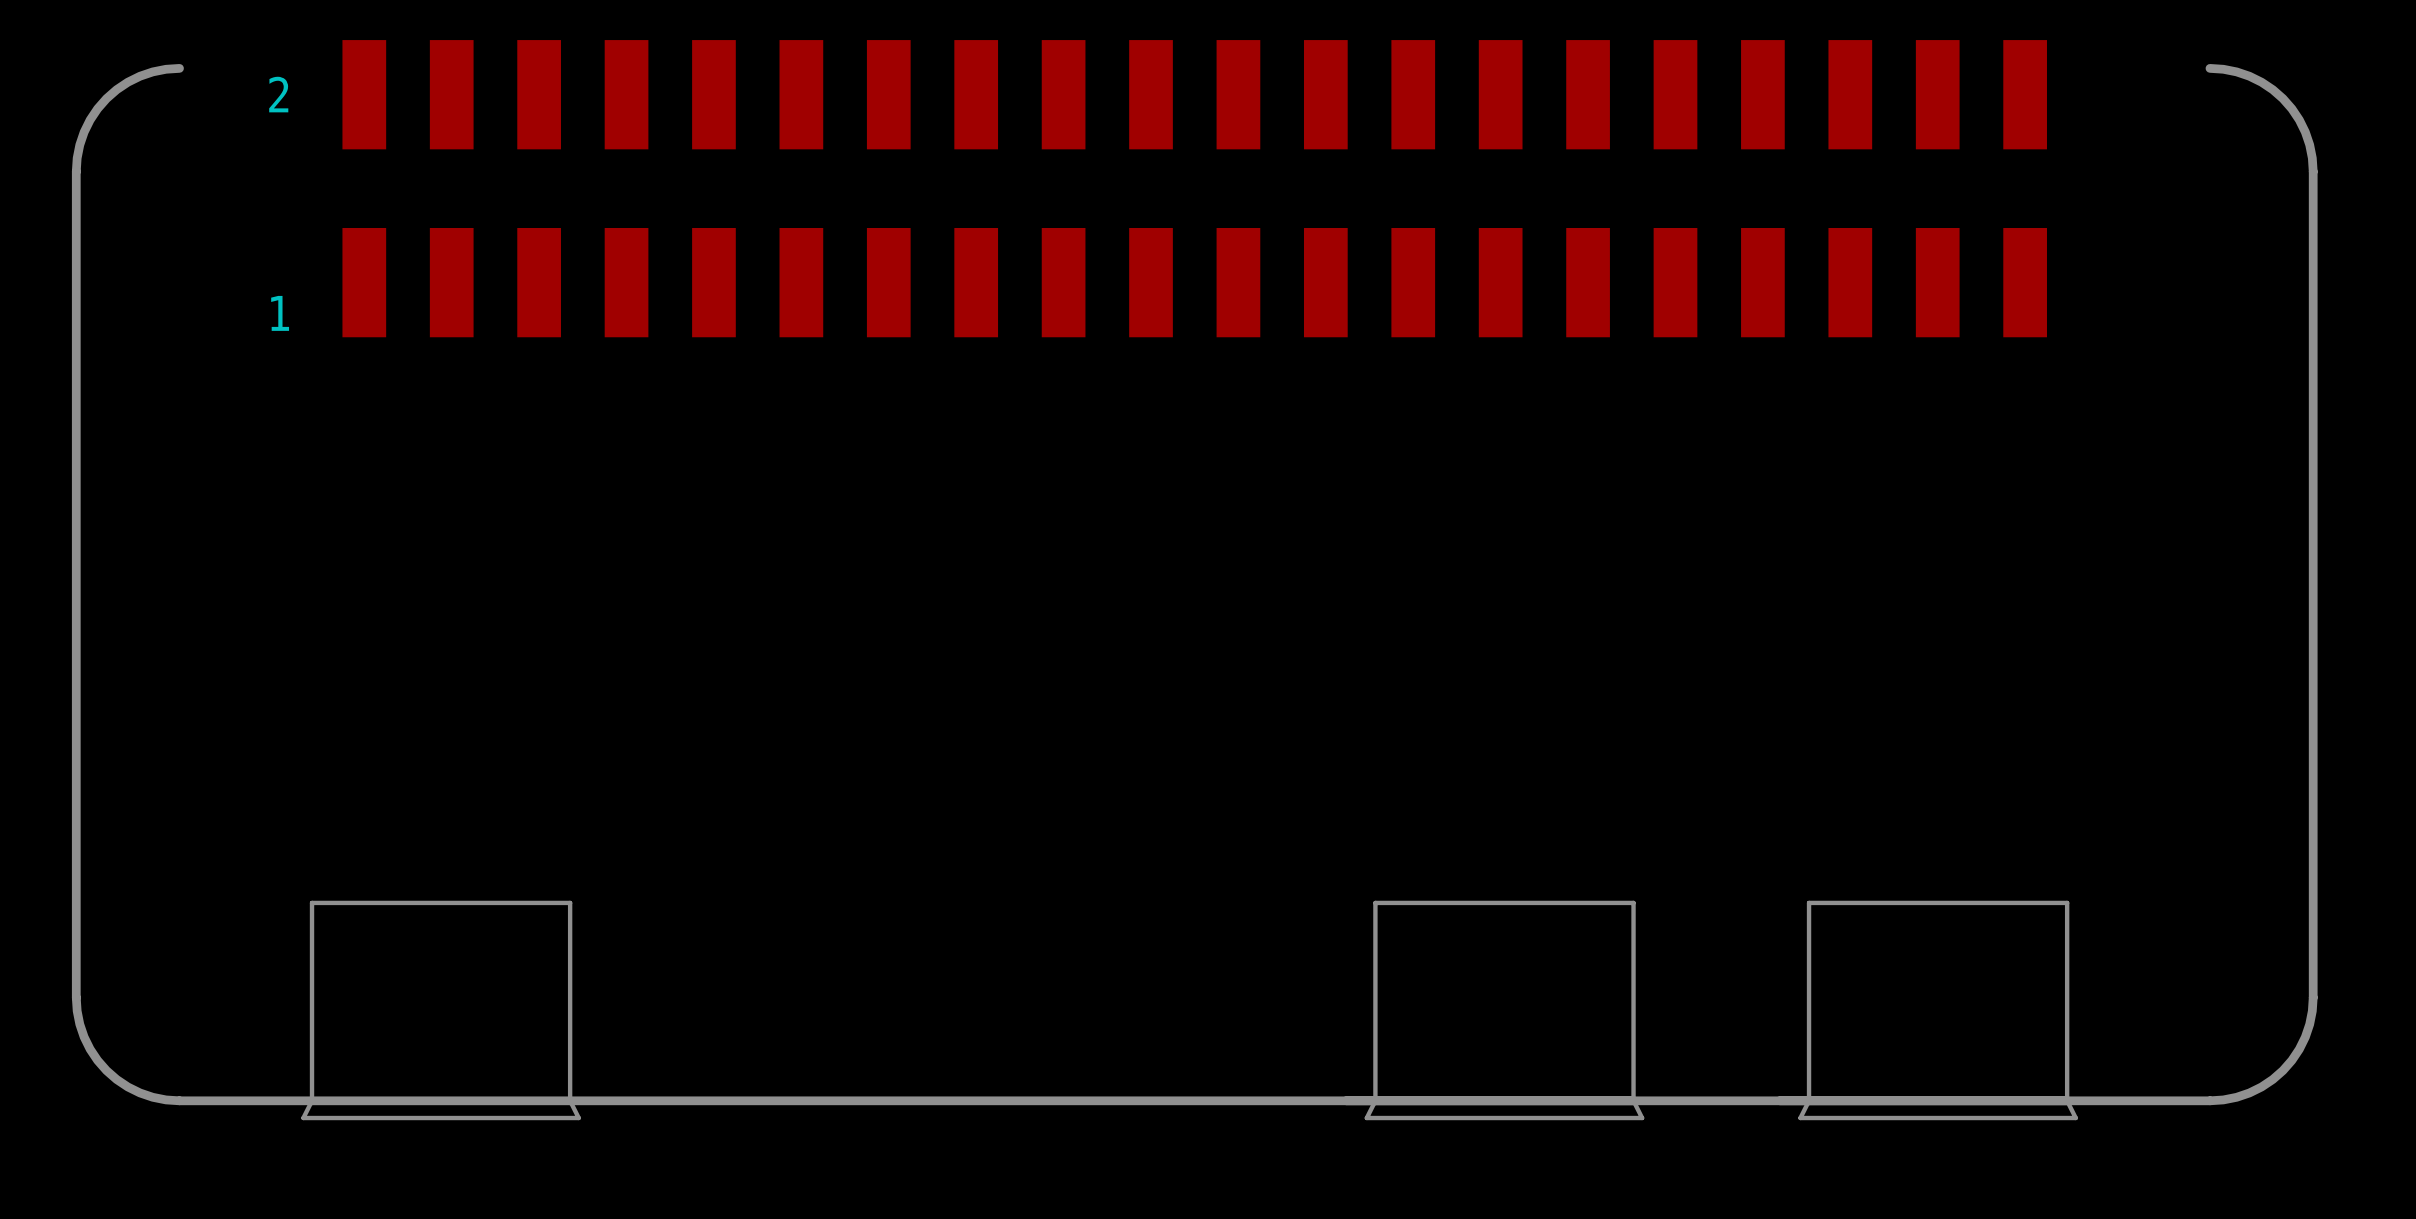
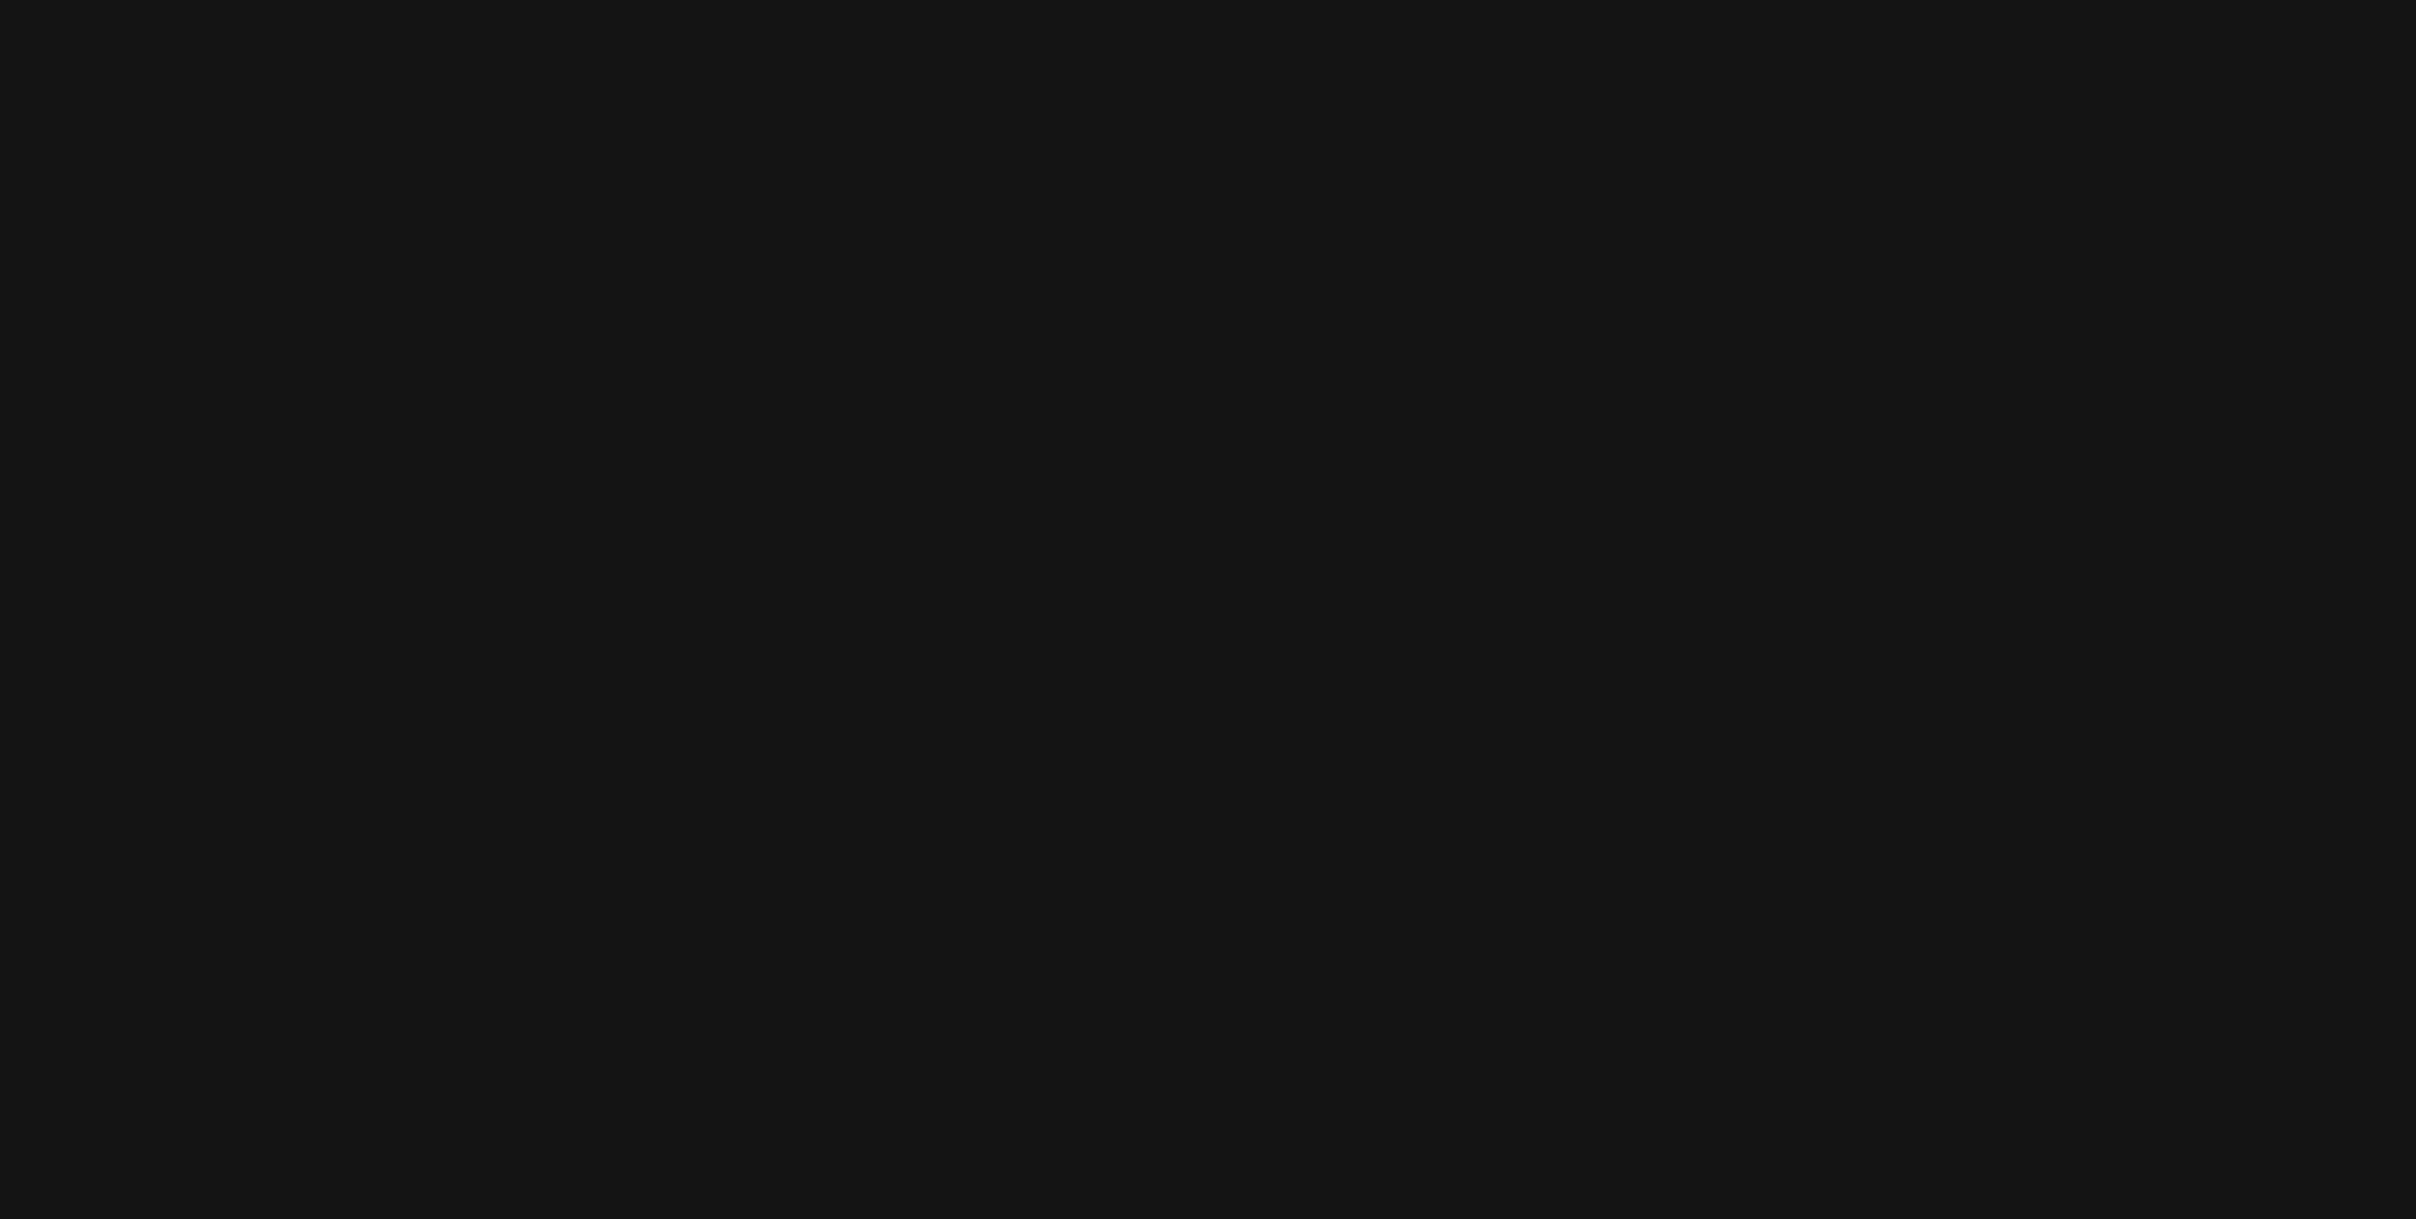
part: (1194, 580) -> none

